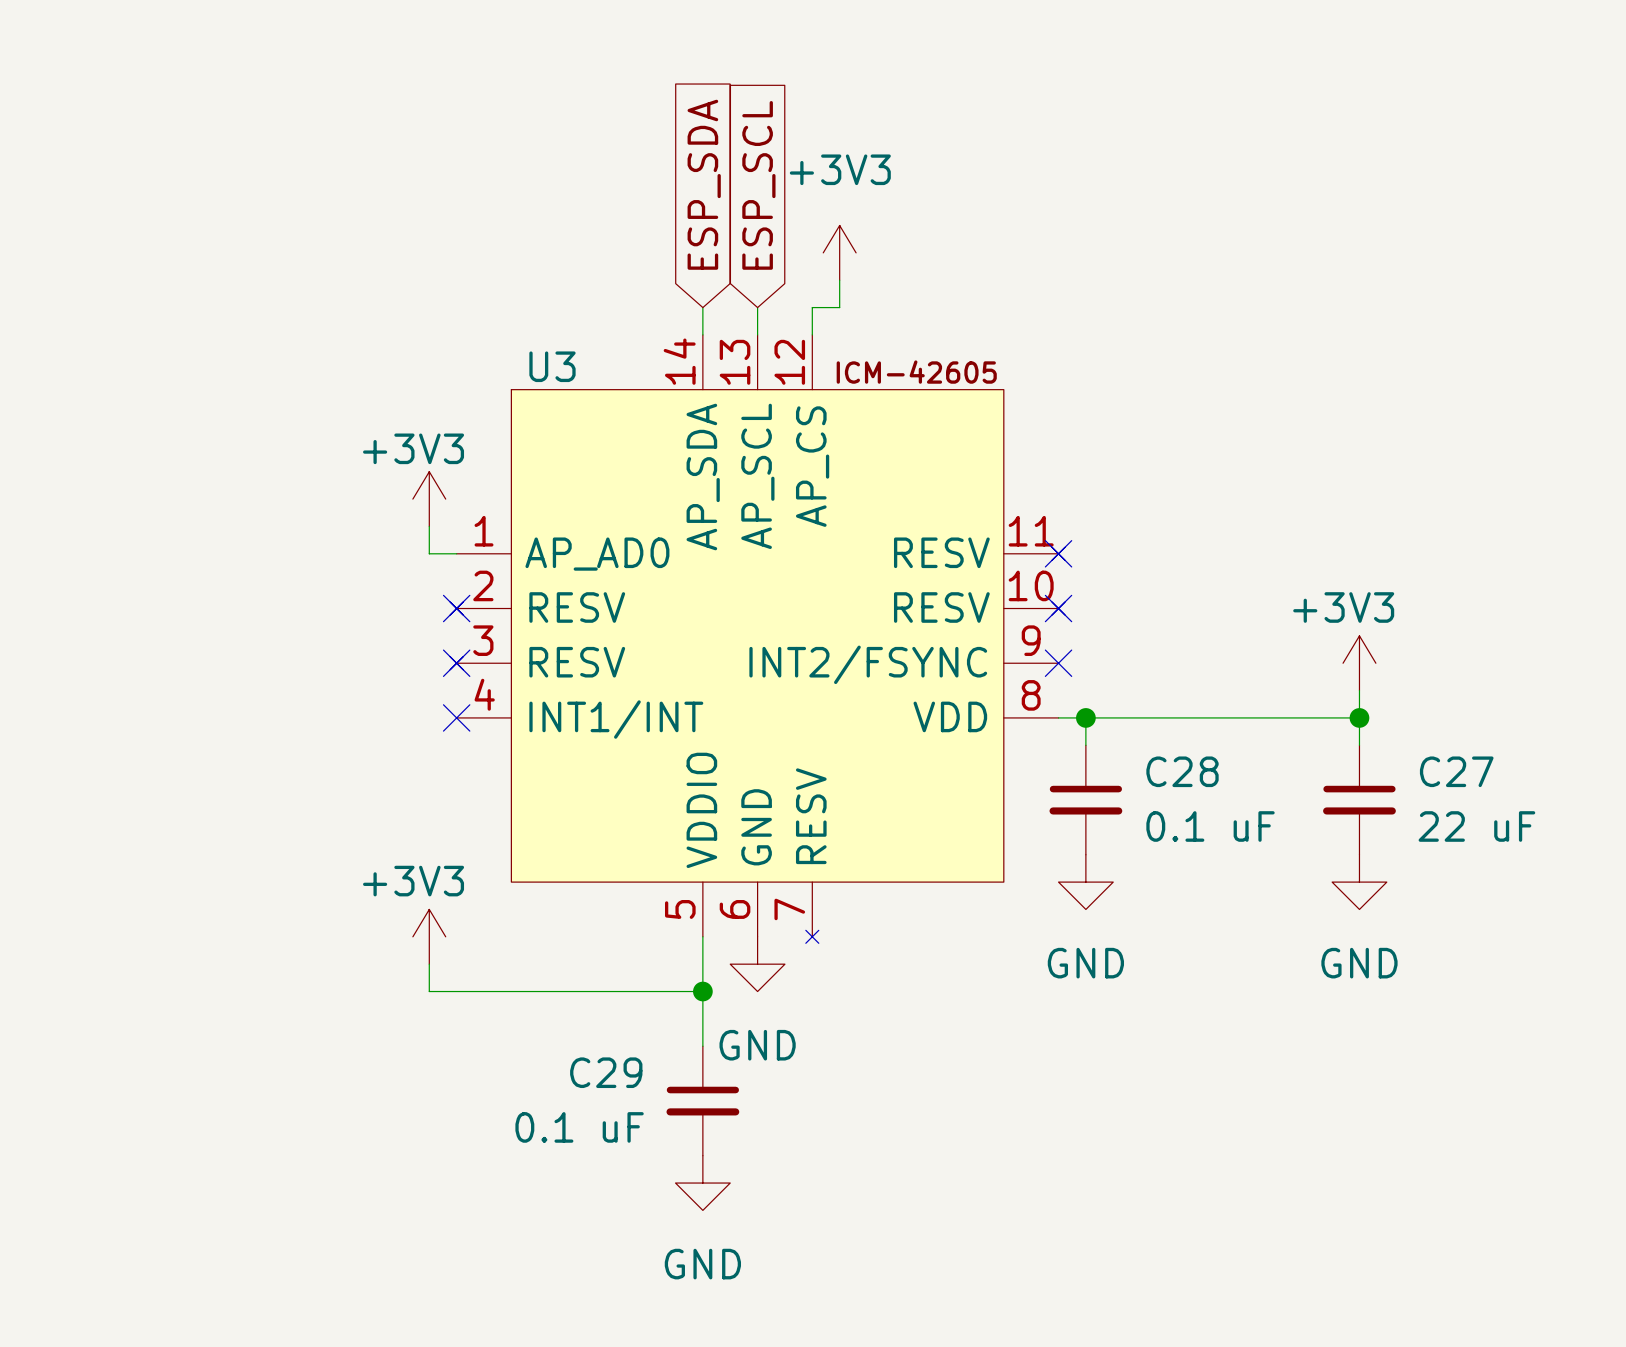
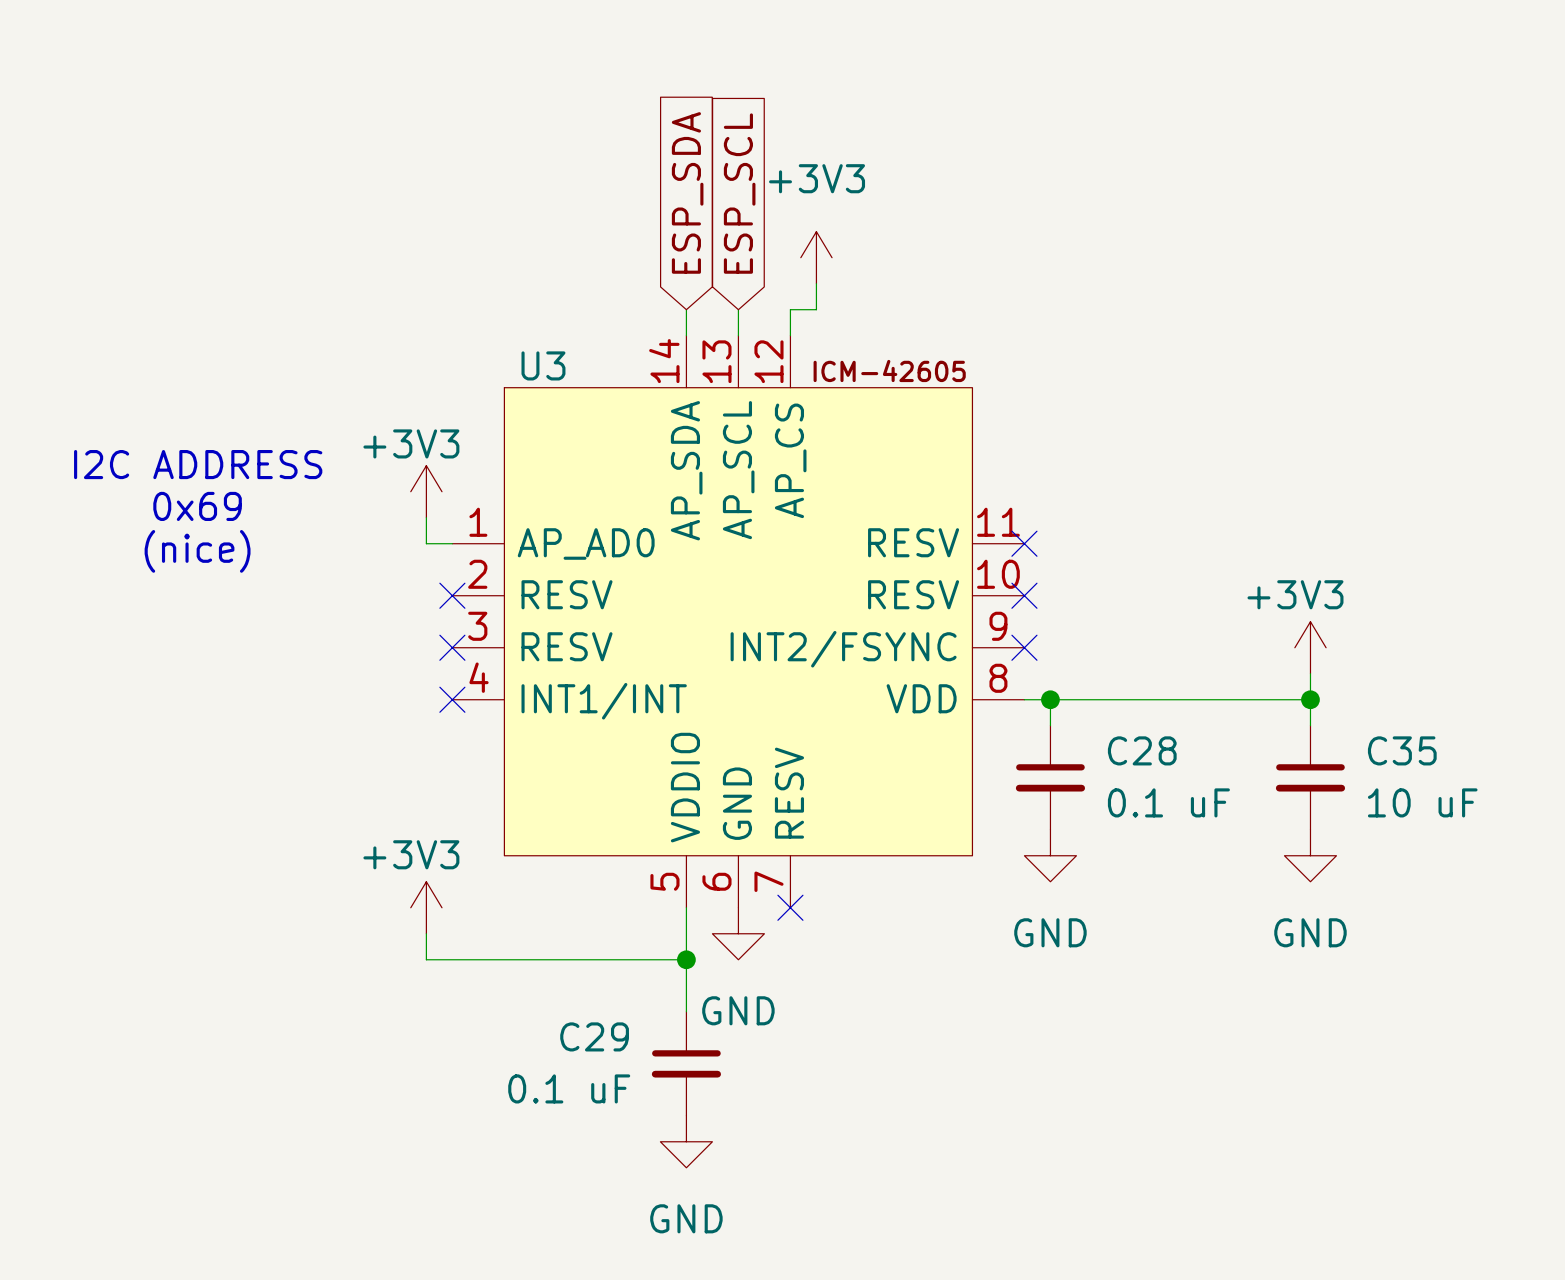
U3 symbol: [450, 334, 1065, 944] -> [452, 335, 1025, 908]
text: none -> I2C ADDRESS (198, 464)
text: none -> 0x69 (197, 506)
text: none -> (nice) (197, 551)
C27 name: C27 (1456, 771) -> C35 (1402, 750)
C27 value: 22 uF (1476, 826) -> 10 uF (1422, 802)
no-connect mark: none -> (790, 907)

